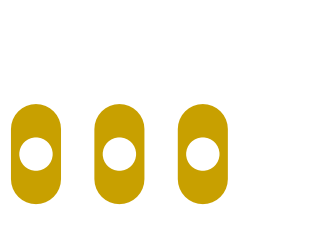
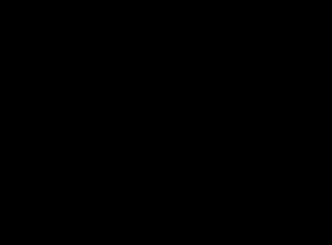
part: (119, 154) -> none

